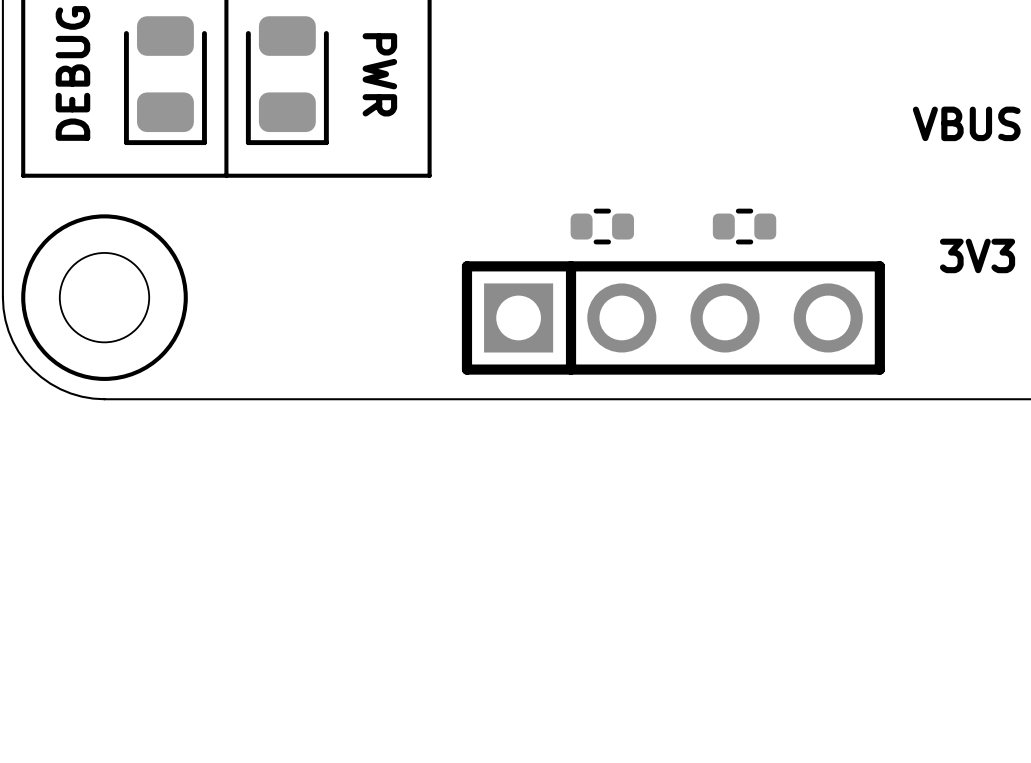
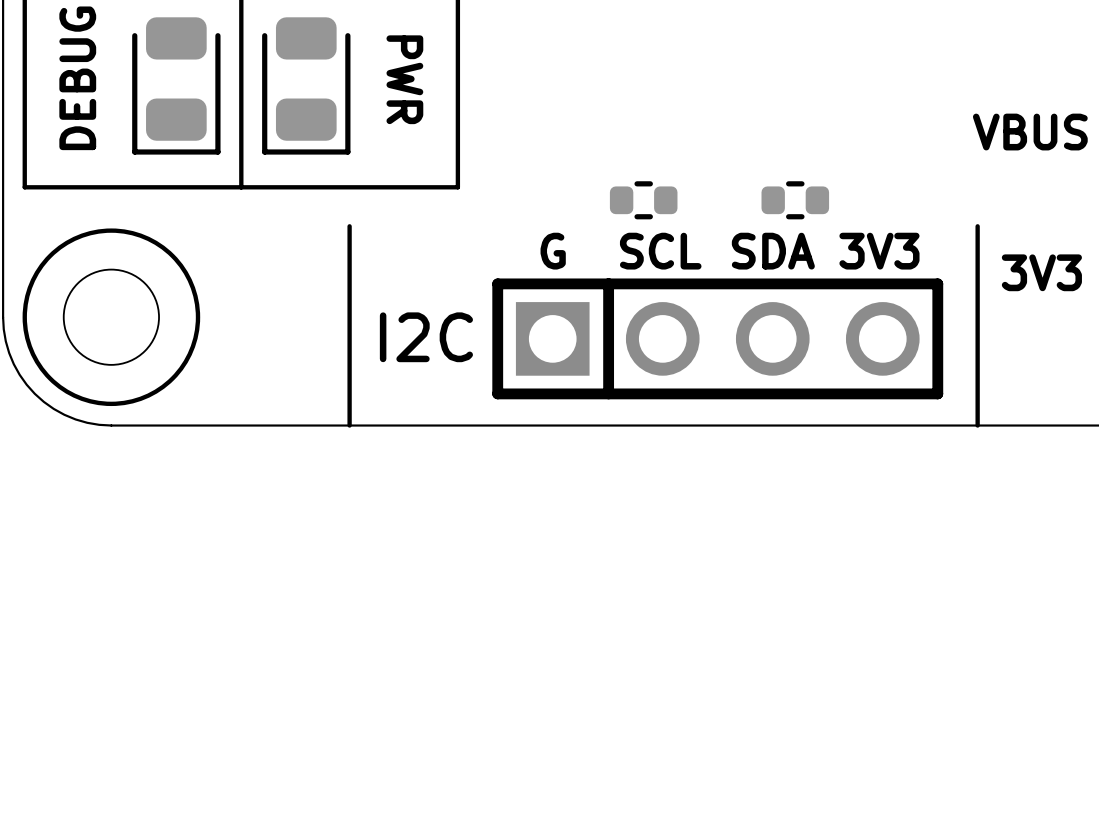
line: none -> (349, 226) (349, 425)
line: none -> (977, 226) (977, 425)
part position: (602, 226) -> (643, 200)
part position: (744, 226) -> (795, 200)
text: none -> G (553, 251)
text: none -> SCL (660, 251)
text: none -> SDA (773, 251)
text: none -> 3V3 (879, 251)
text: none -> I2C (426, 337)

